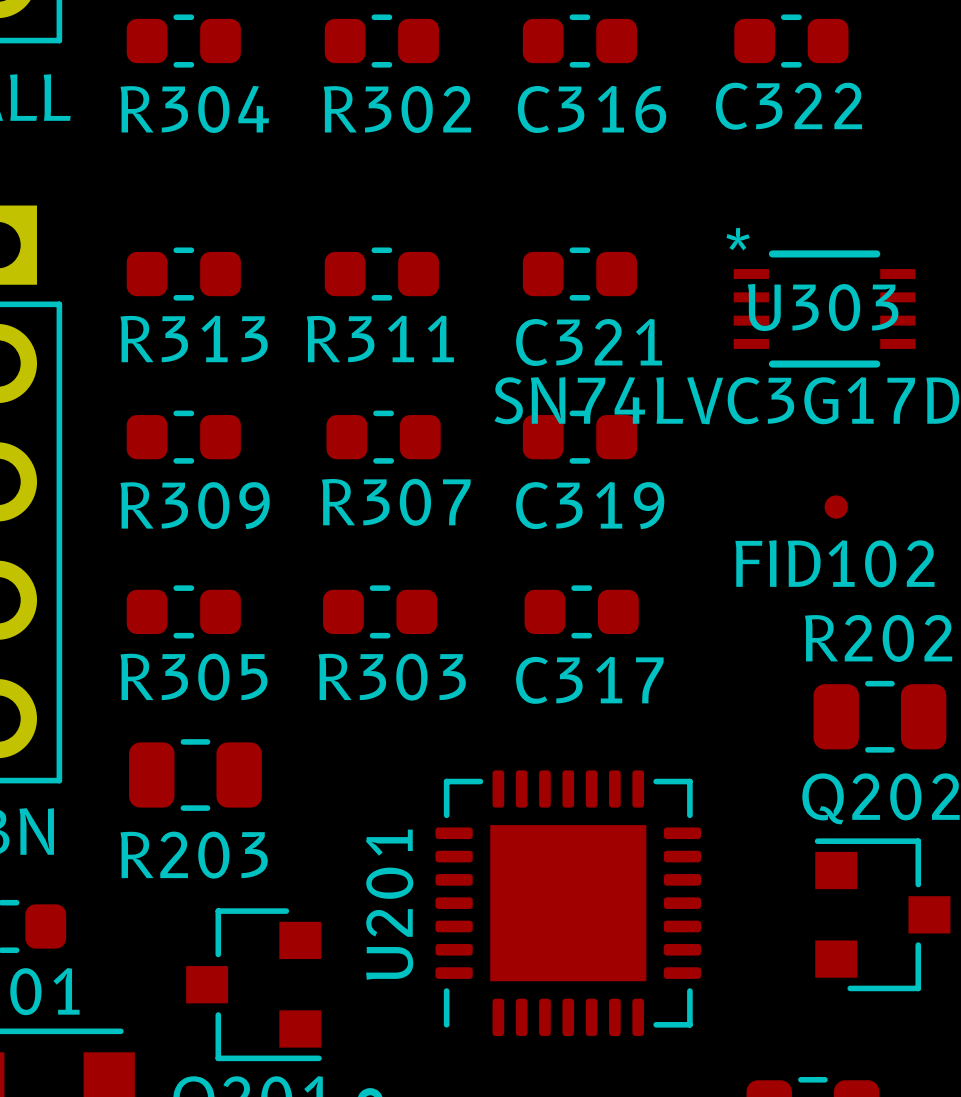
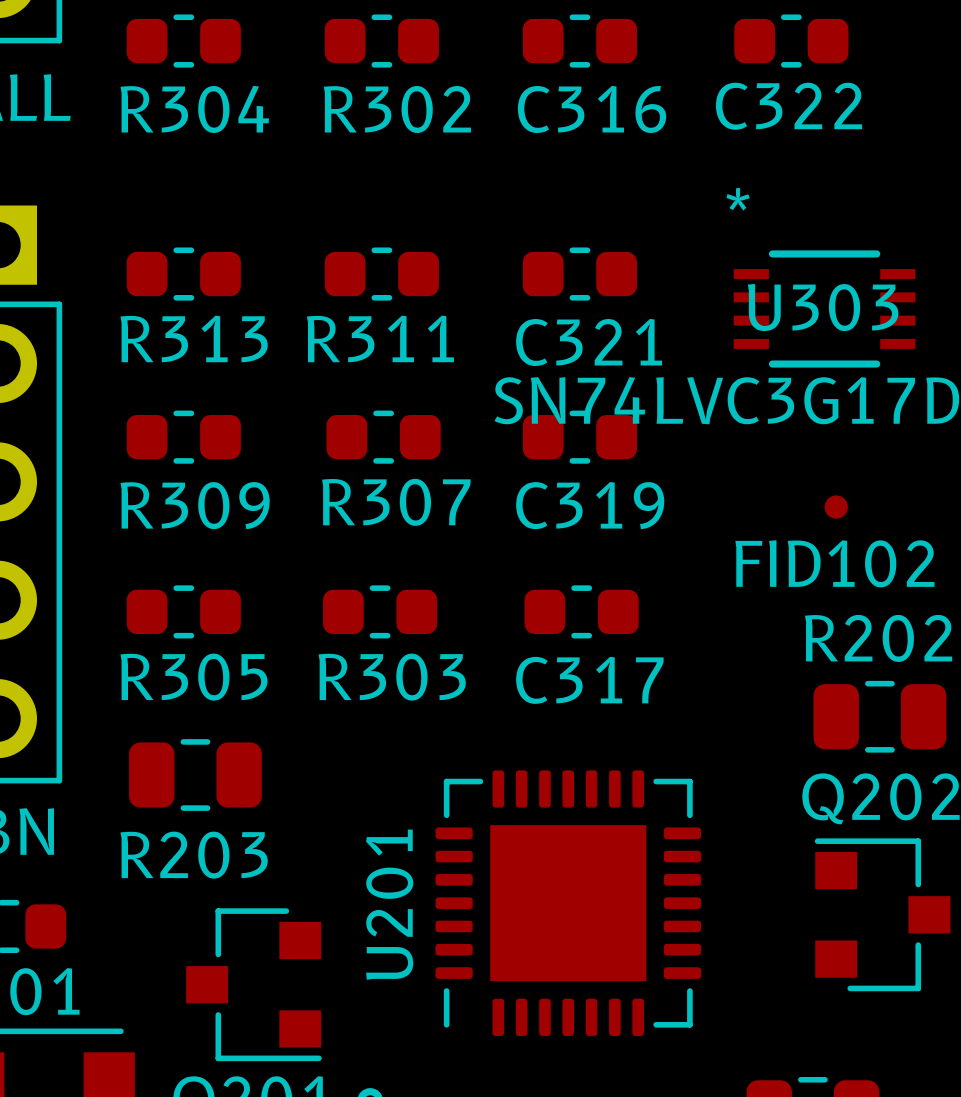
U303 text position: * (738, 239) -> * (738, 199)

